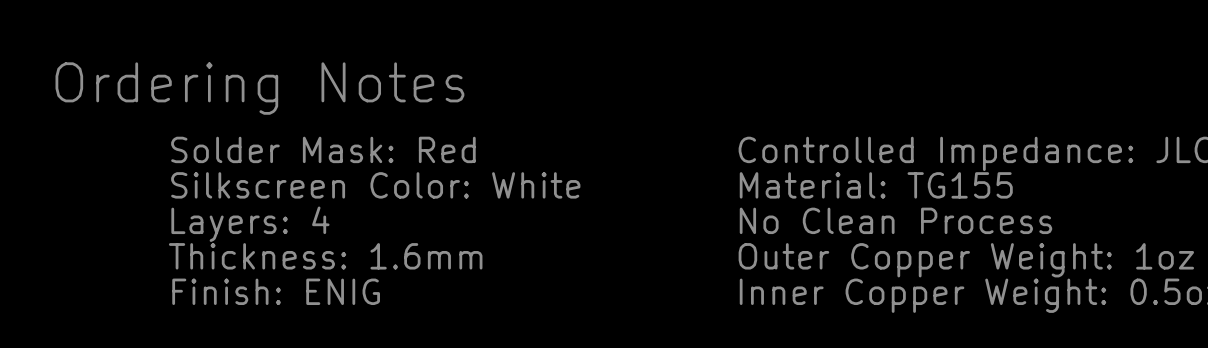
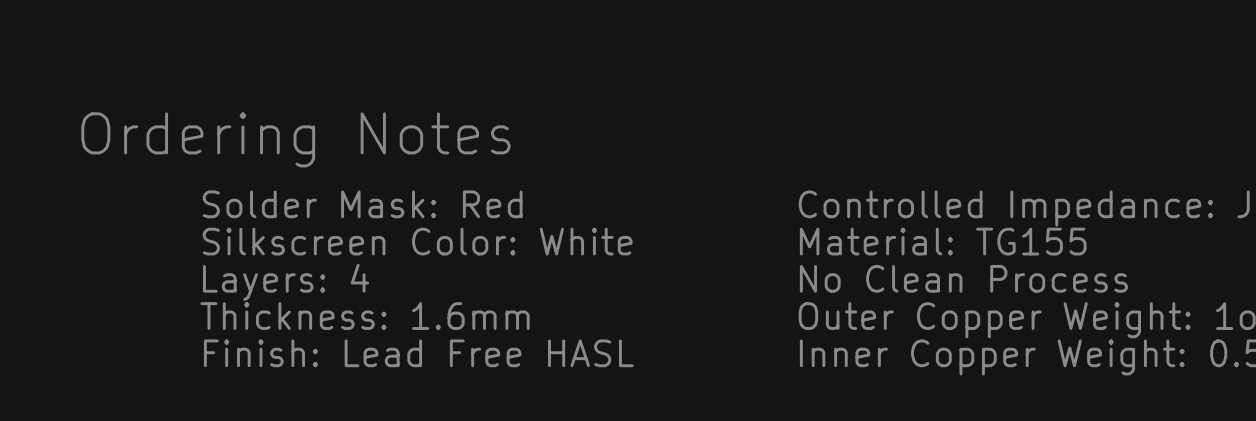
text: Finish: ENIG (276, 291) -> Finish: Lead Free HASL (418, 353)

